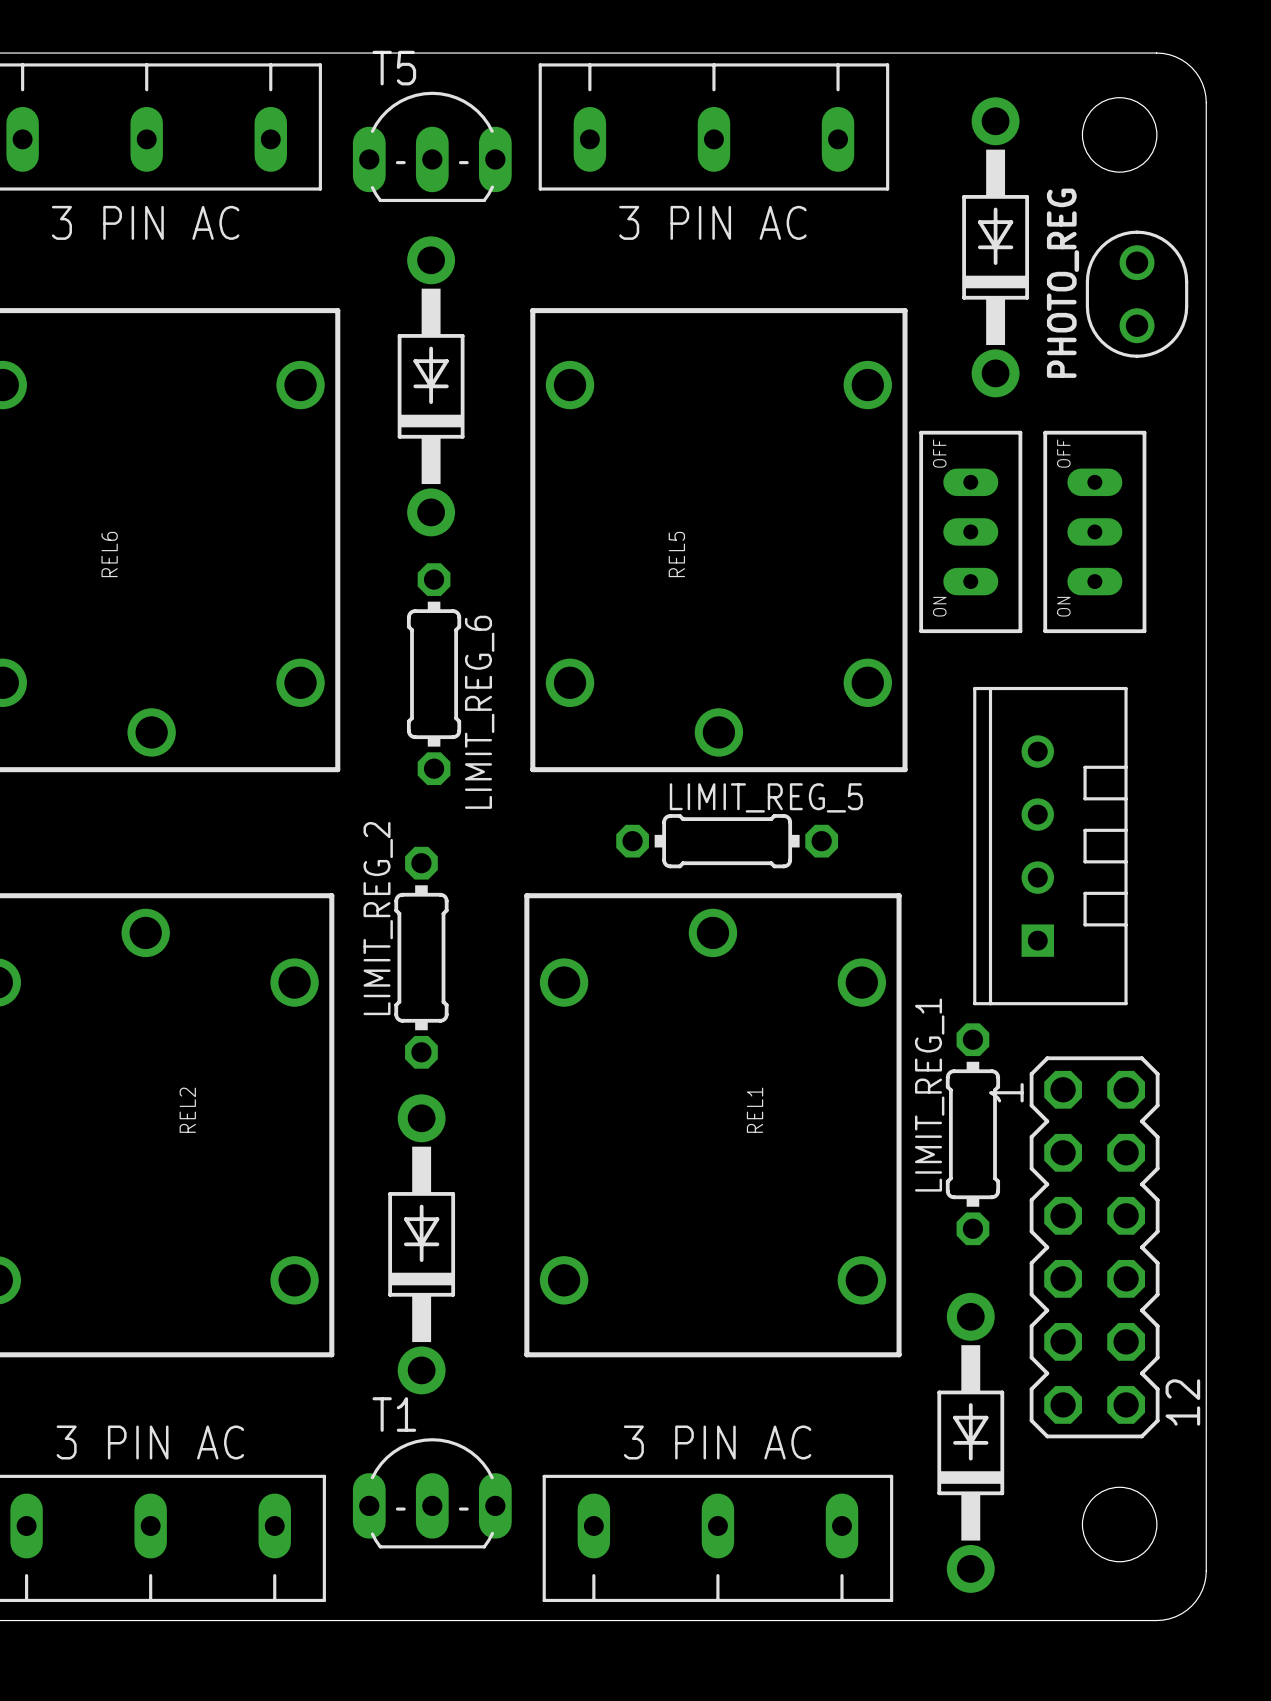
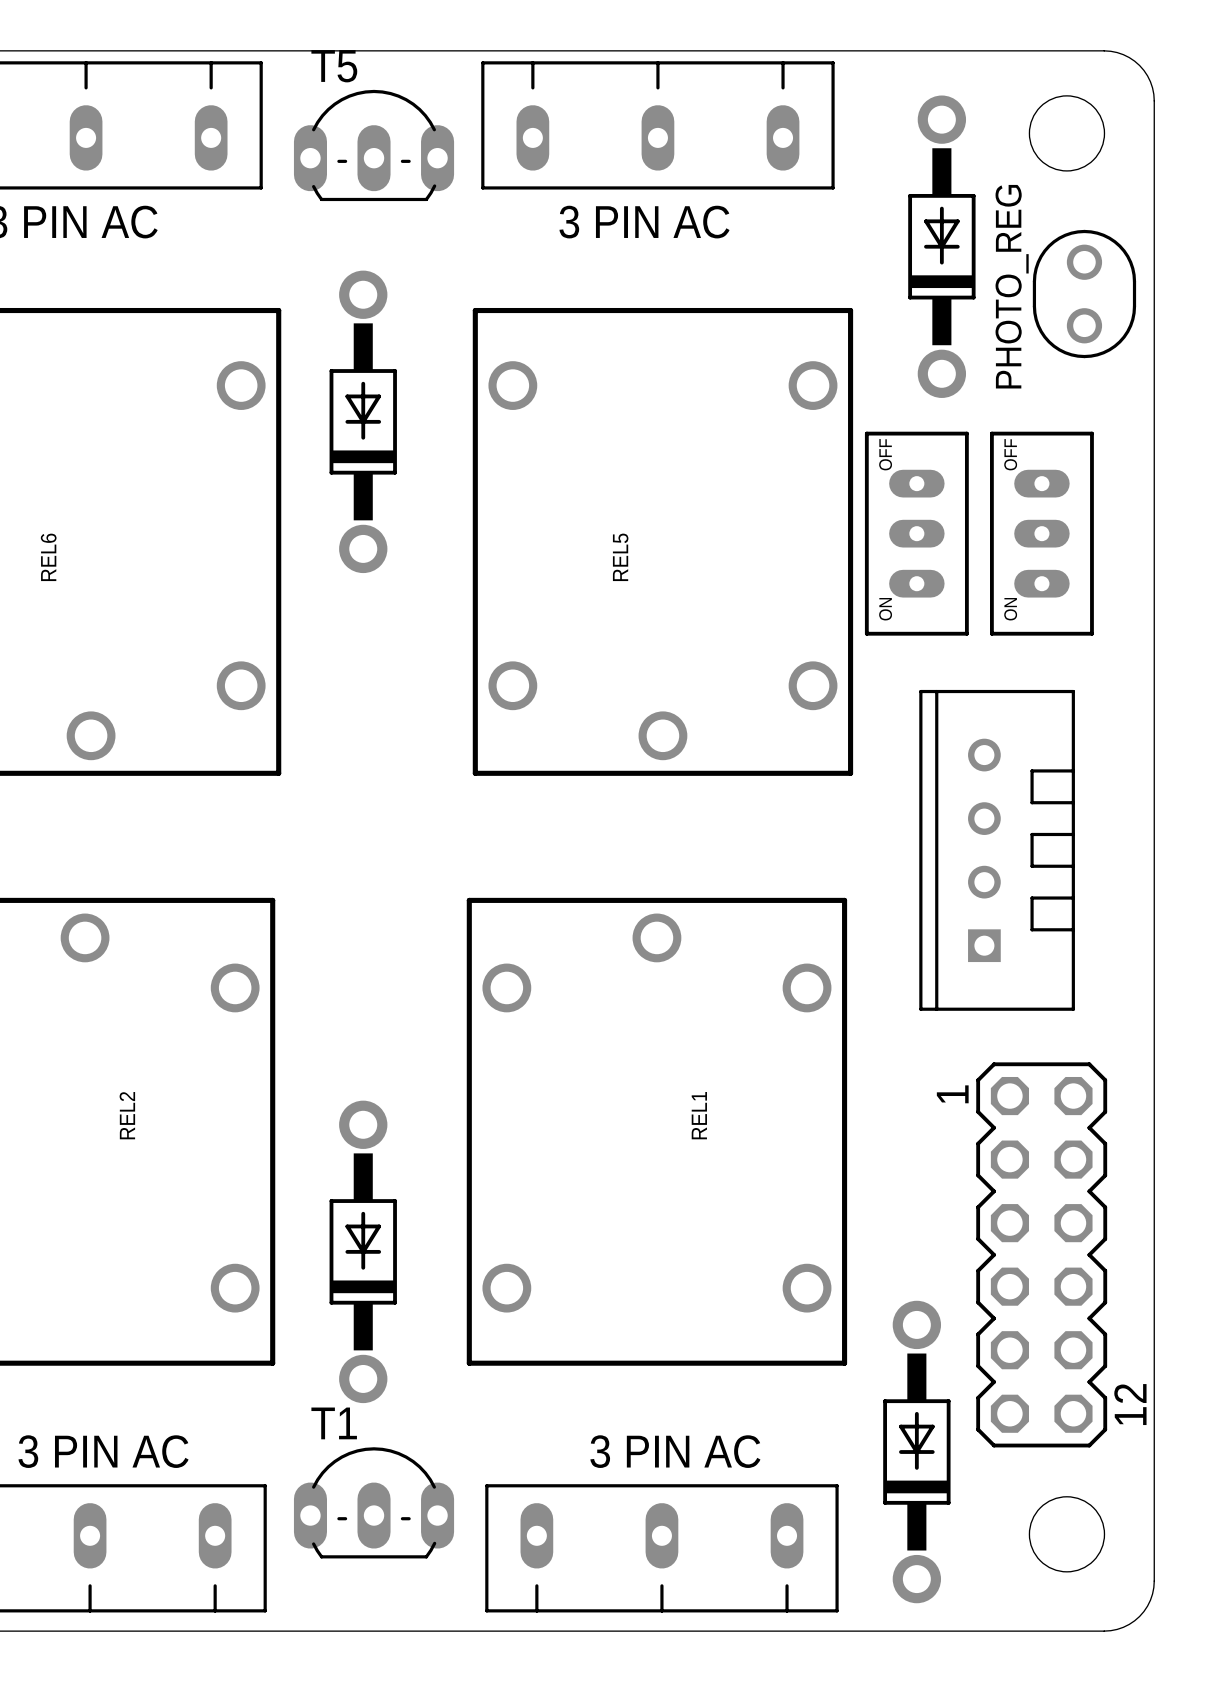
part position: (431, 386) -> (363, 421)
LIMIT_REG_6: (434, 674) -> none
LIMIT_REG_5: (727, 841) -> none
LIMIT_REG_2: (421, 957) -> none
LIMIT_REG_1: (972, 1134) -> none

